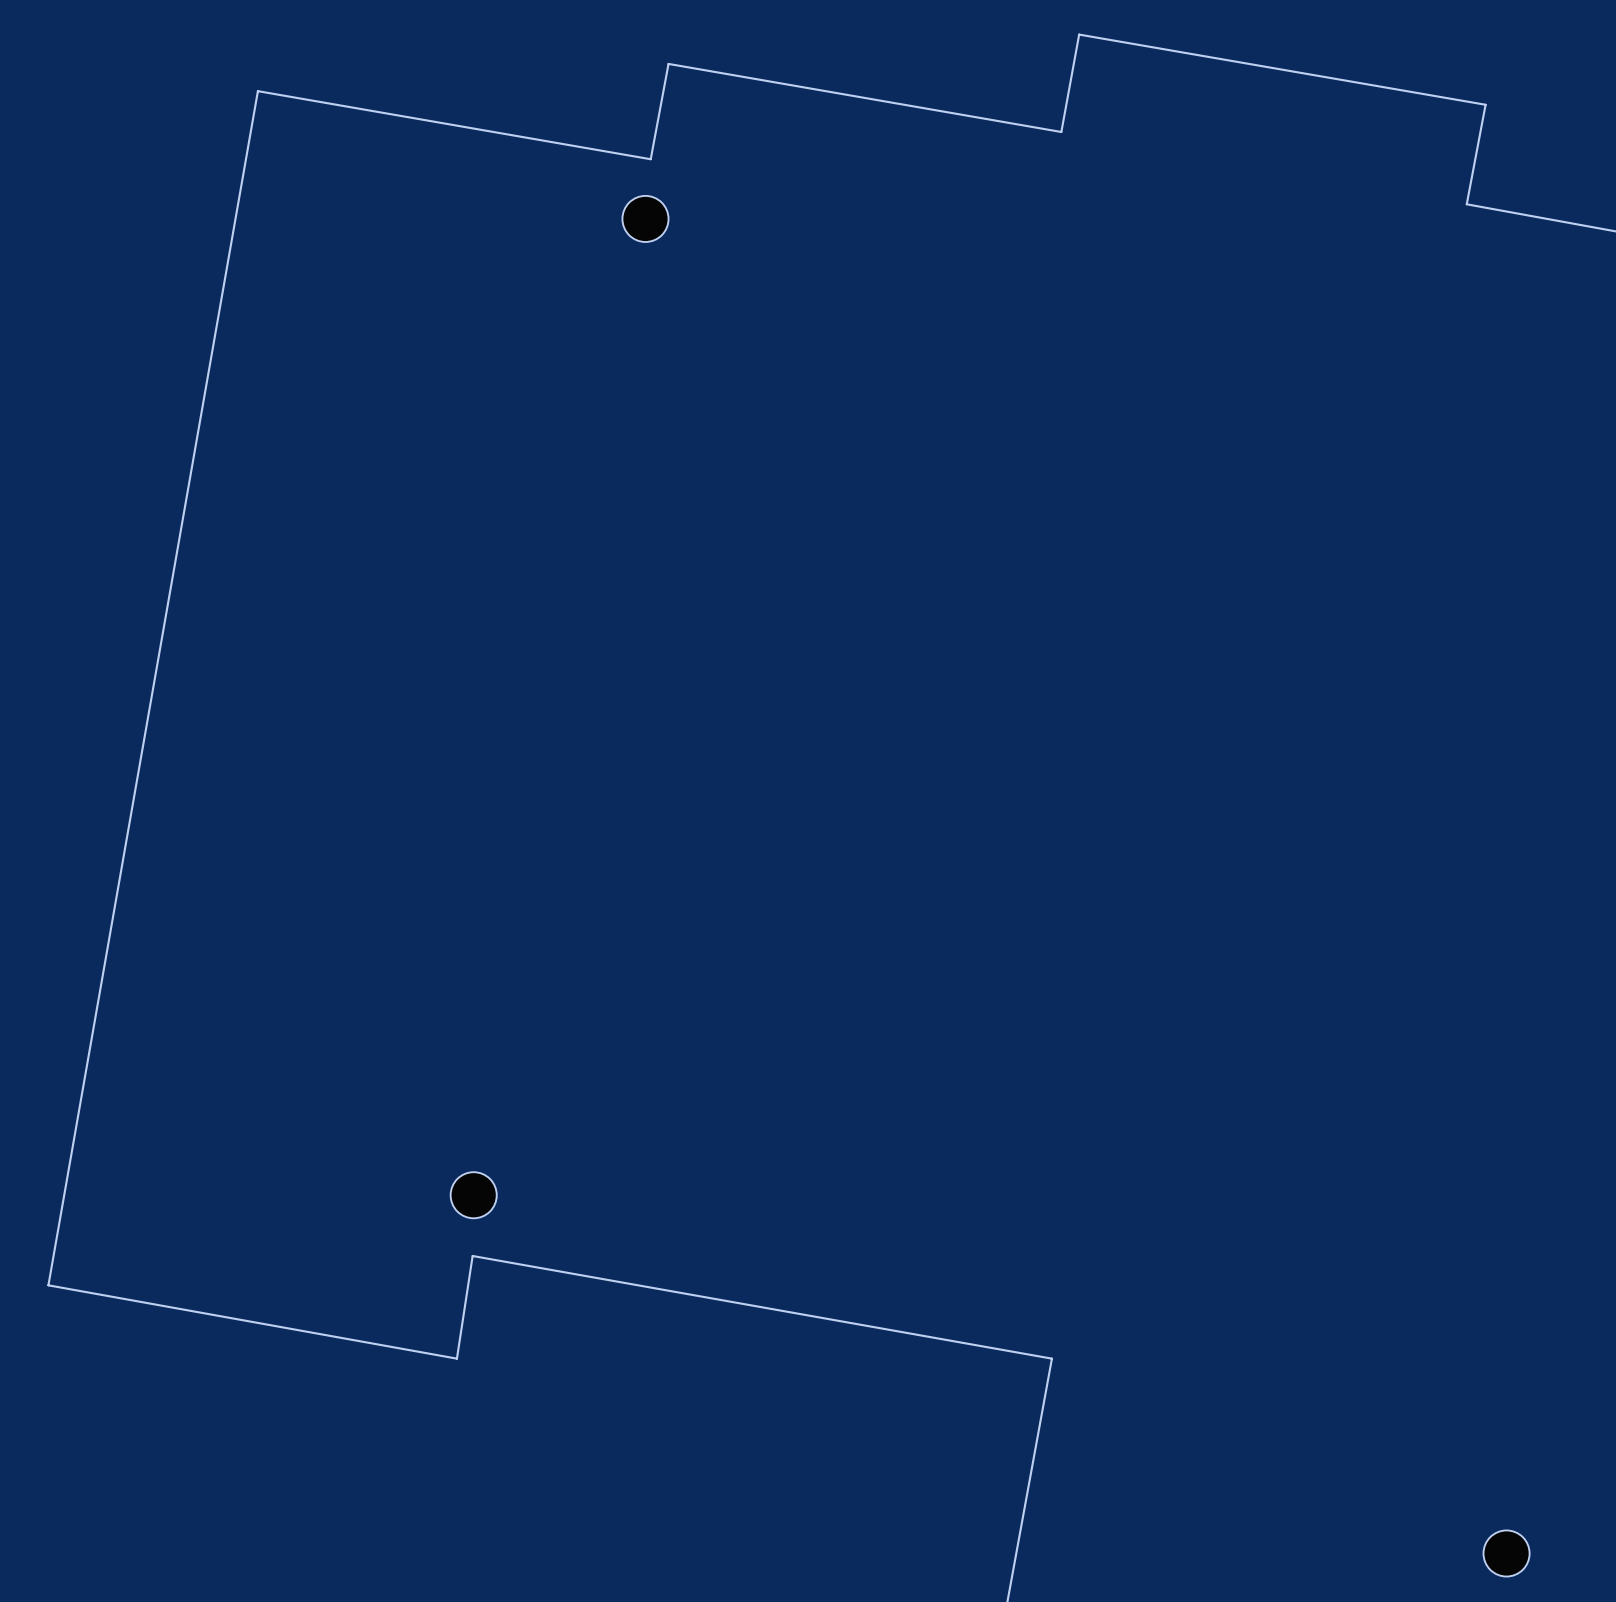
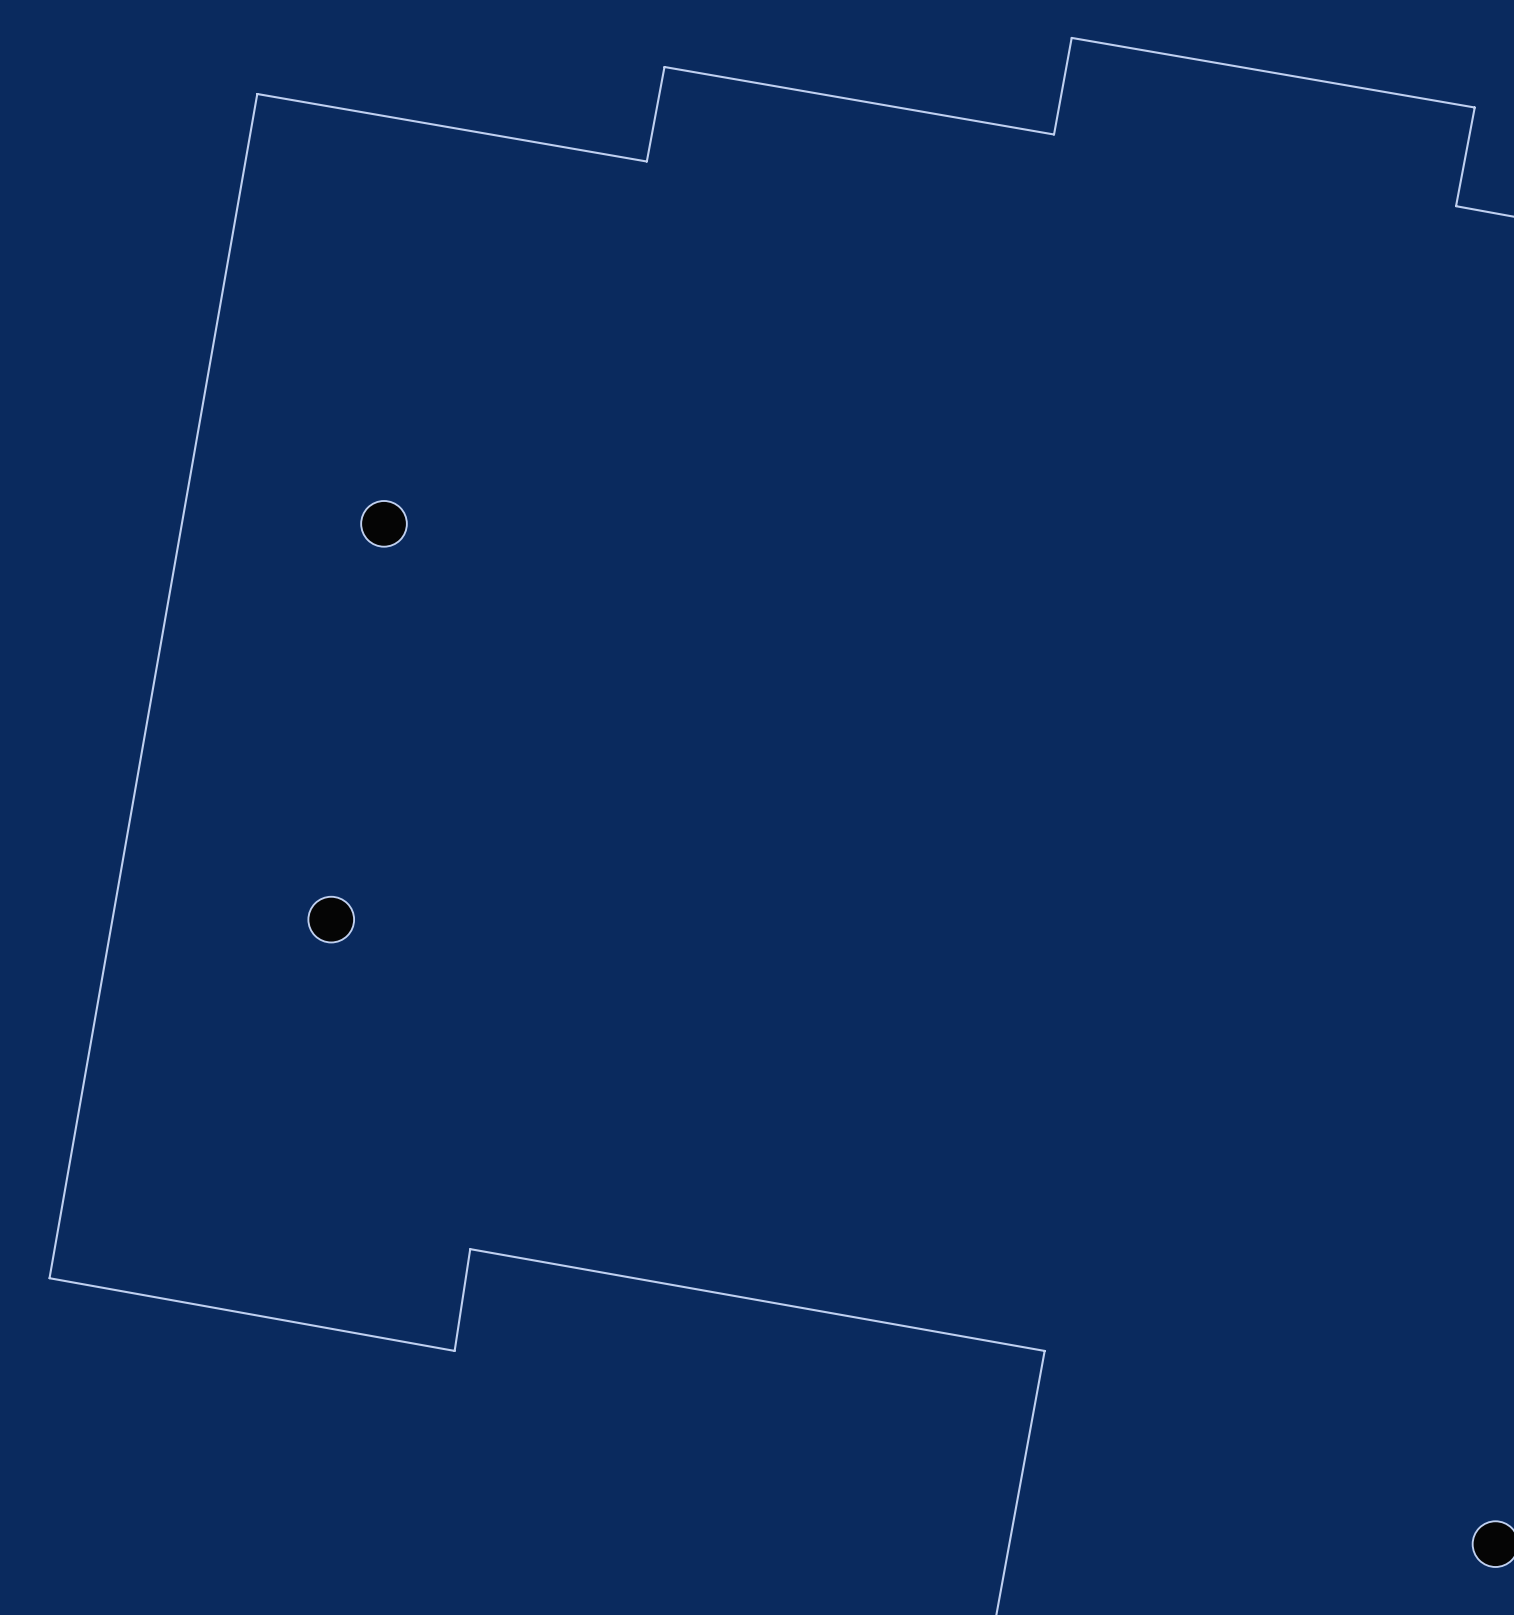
part: (645, 218) -> none
part: none -> (384, 523)
part position: (473, 1195) -> (331, 919)

